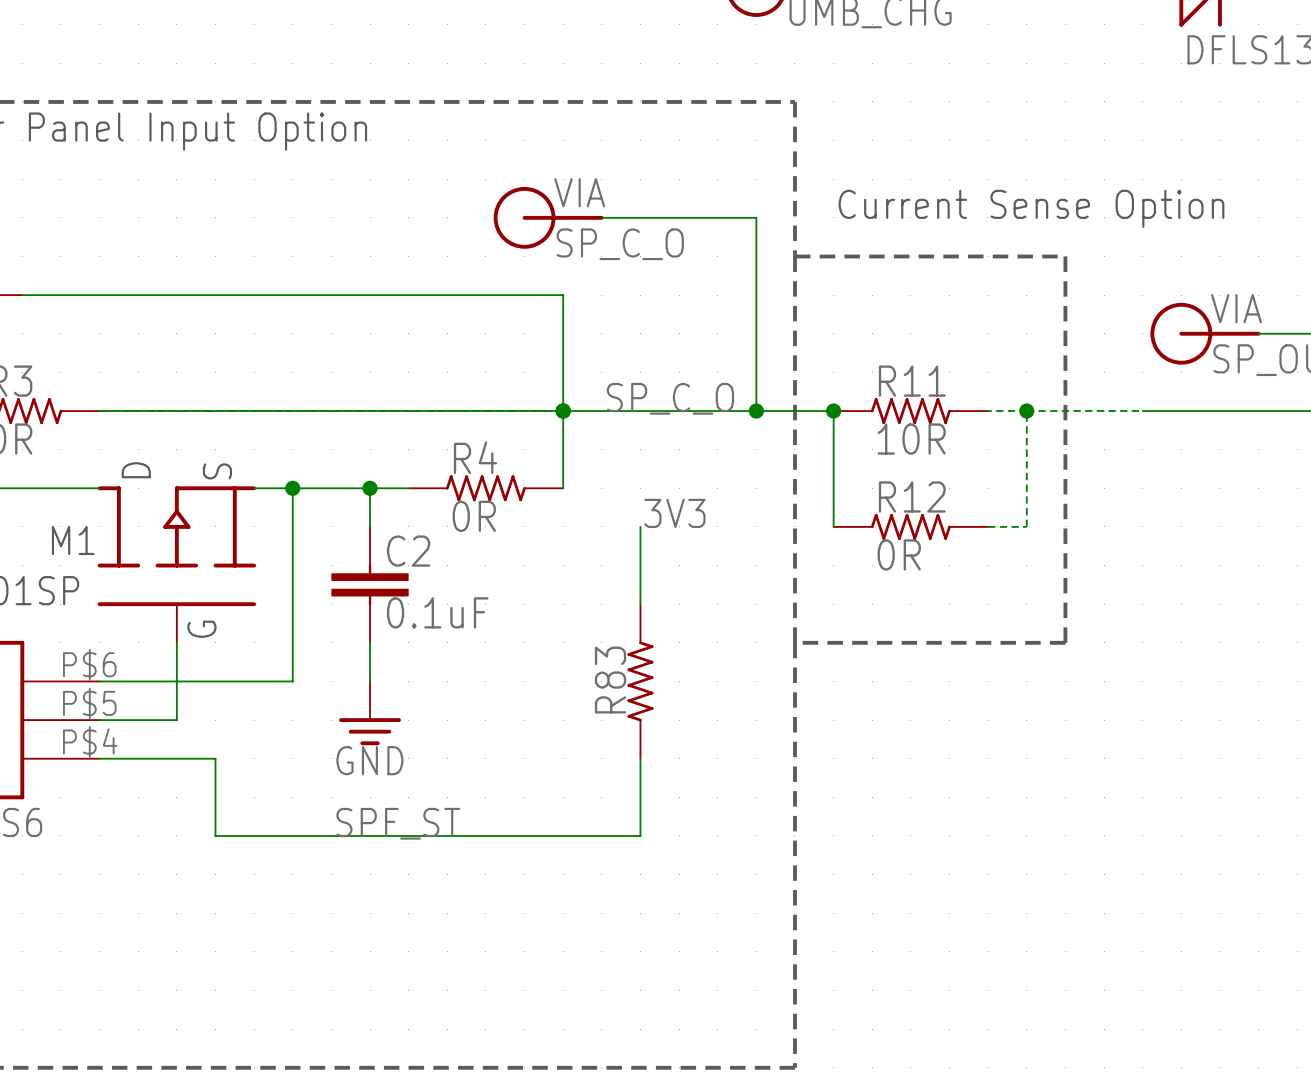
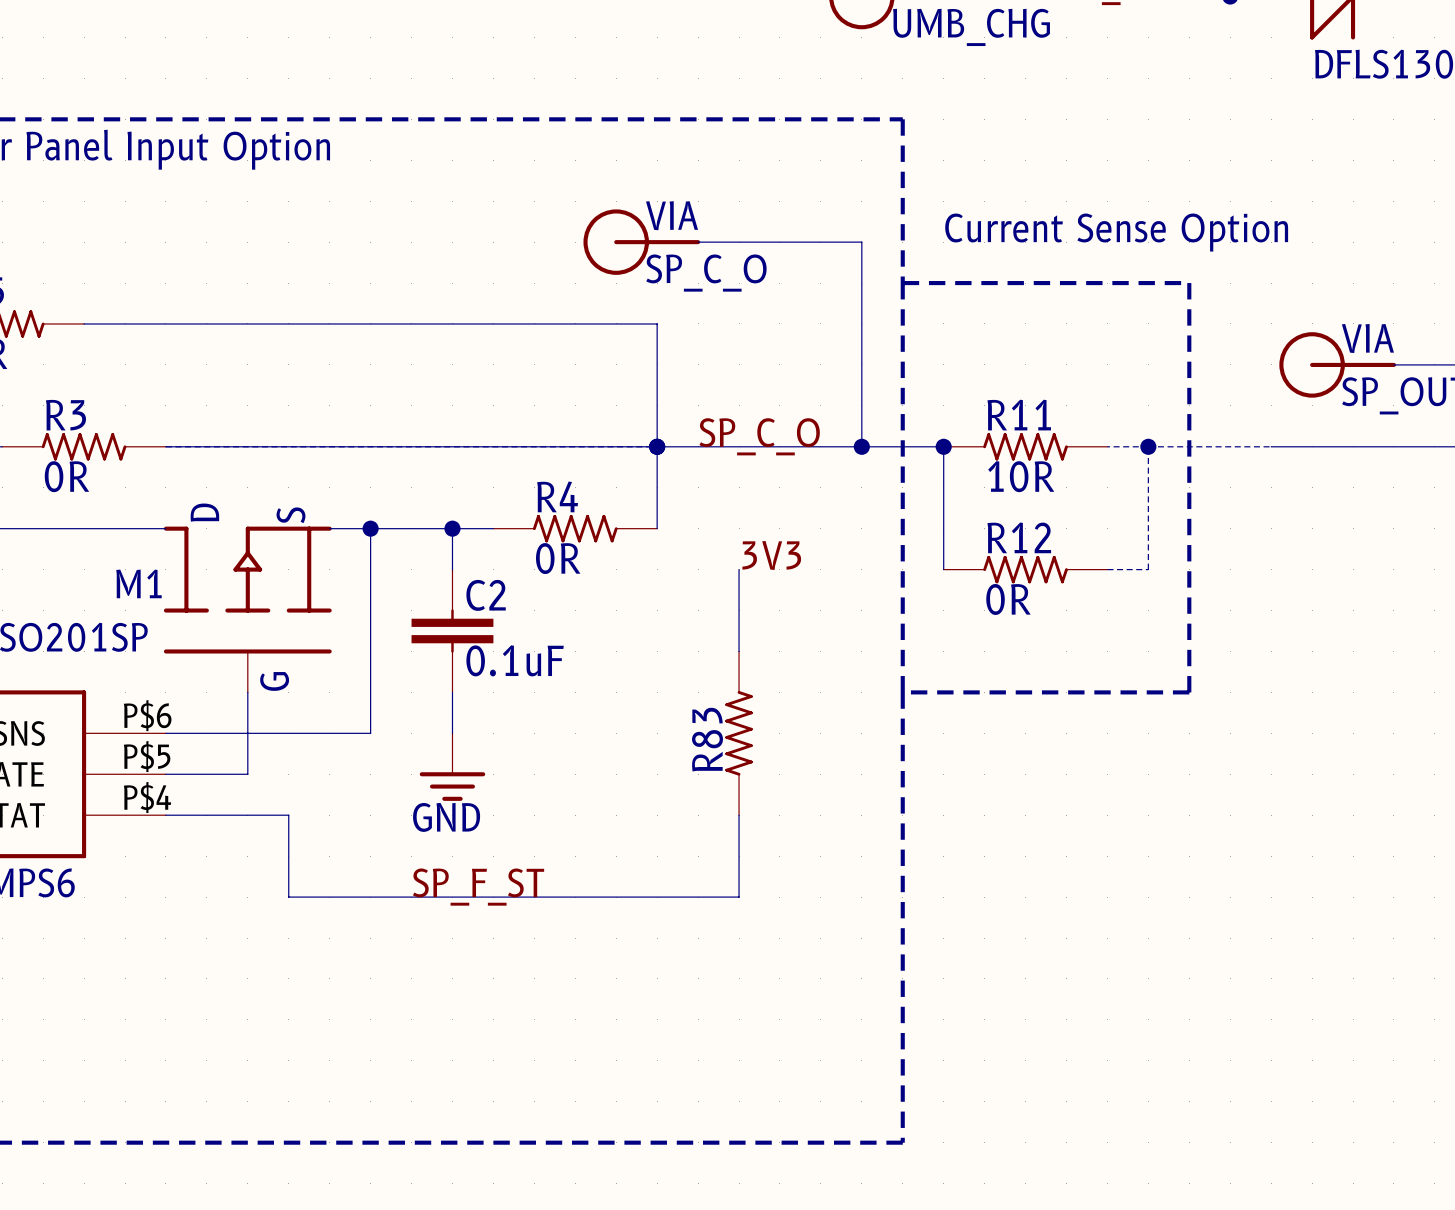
label: SPF_ST (398, 823) -> SP_F_ST (478, 887)

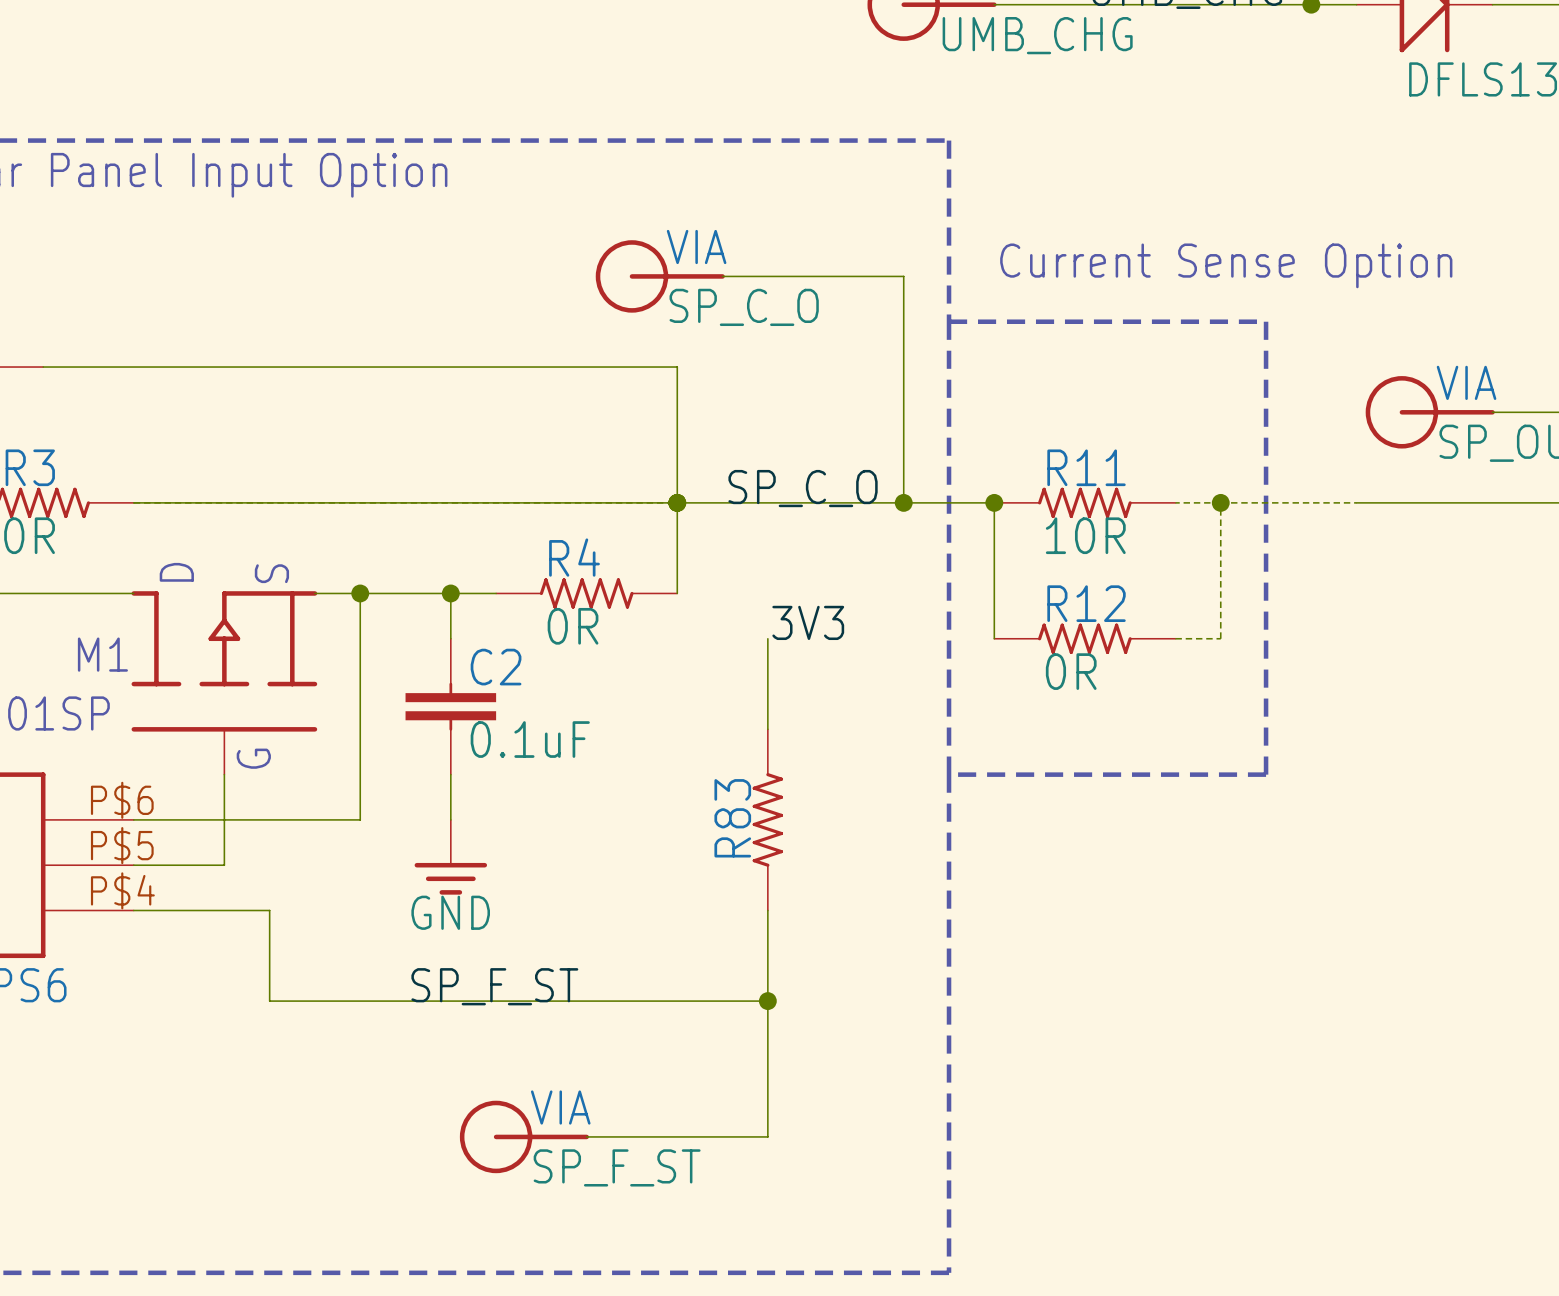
wire: none -> (767, 1001) (767, 1136) (586, 1136)
junction: none -> (767, 1001)
part: none -> SP_F_ST (524, 1136)

